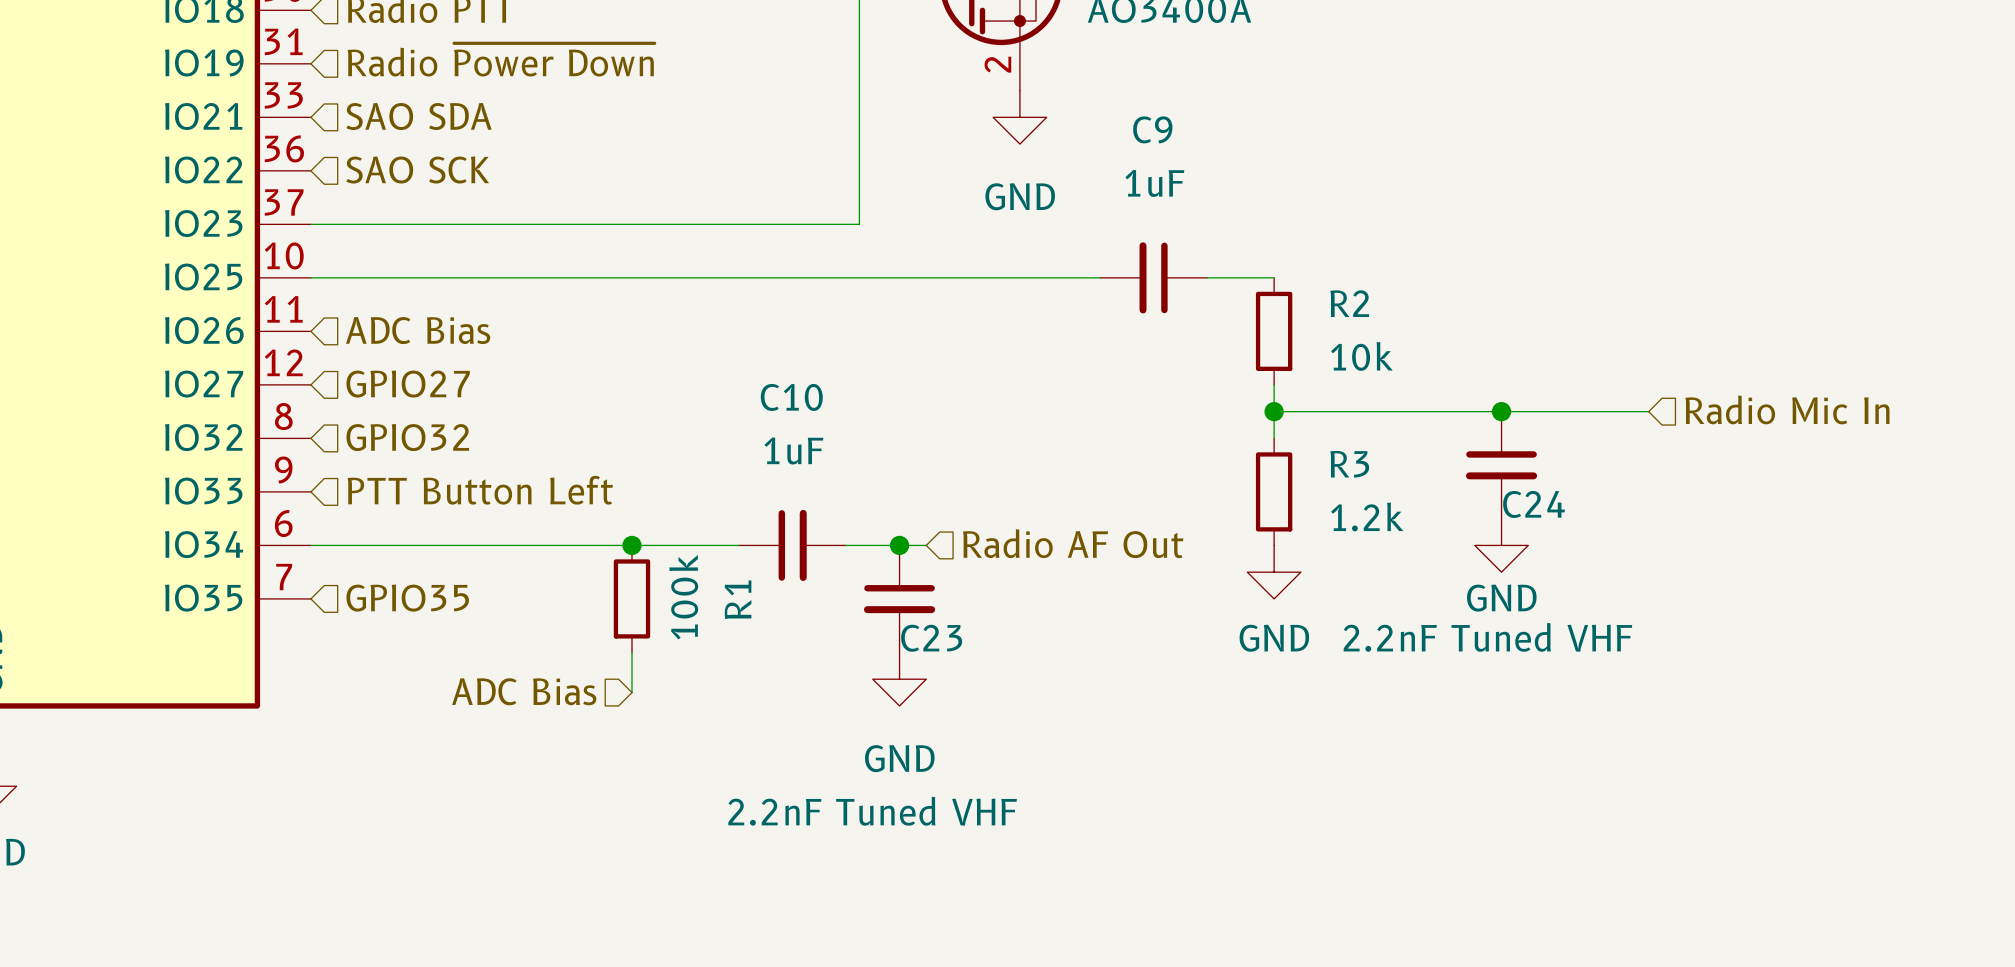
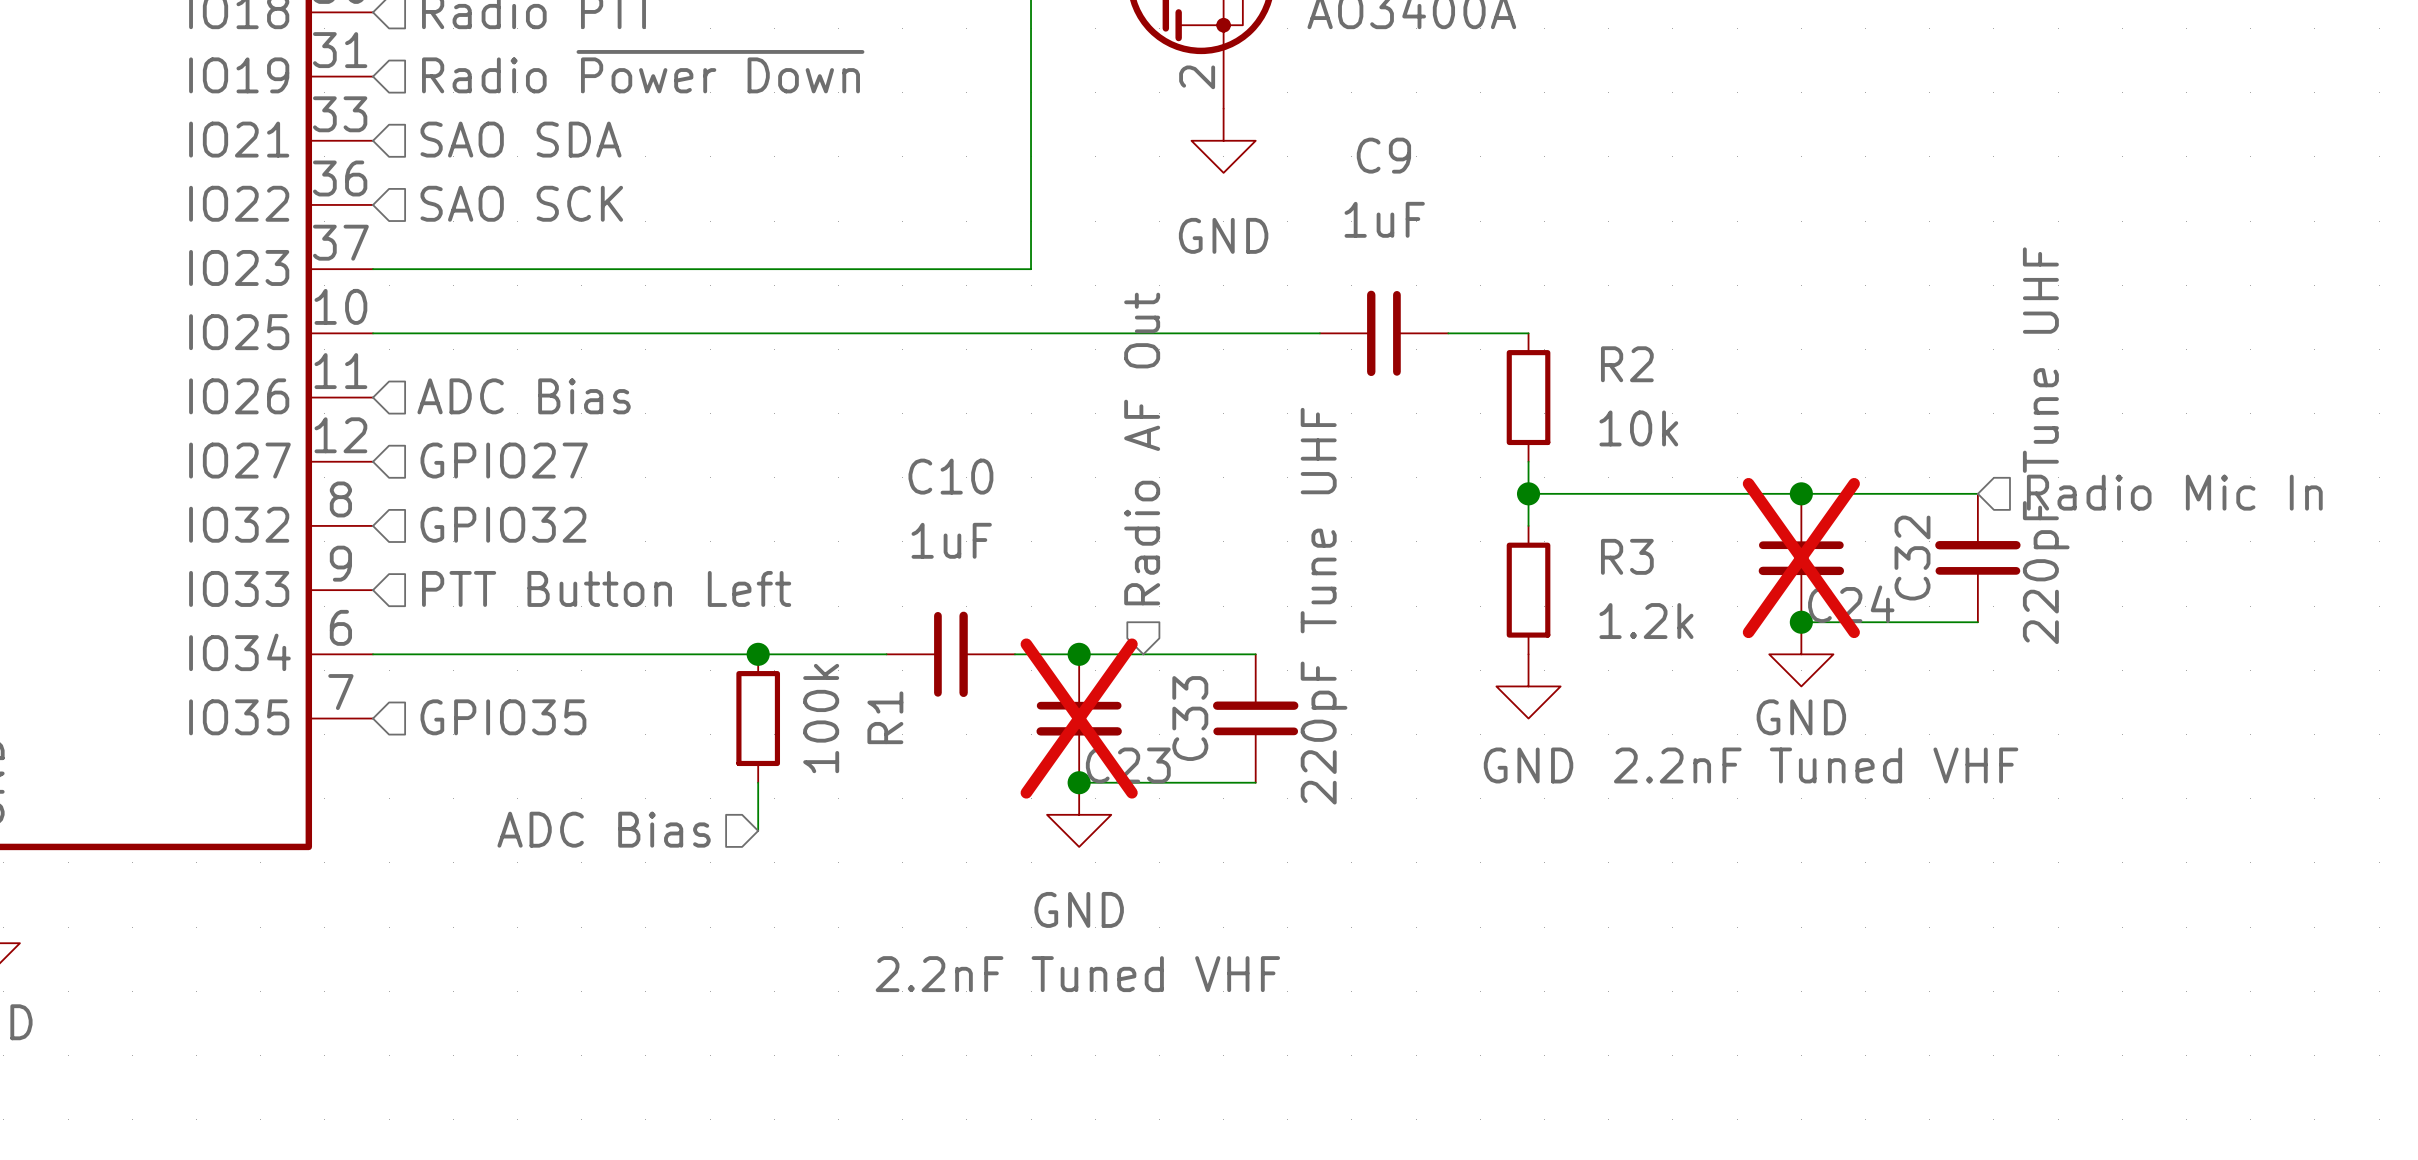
C24 do-not-place cross: none -> (1801, 558)
C32: none -> 220pF Tune UHF (1977, 558)
wire: none -> (1801, 622) (1977, 622)
junction: none -> (1801, 622)
hierarchical label rotation: 0° (1073, 543) -> 90° counterclockwise (1142, 449)
wire: none -> (1111, 654) (1255, 654)
C23 do-not-place cross: none -> (1079, 718)
C33: none -> 220pF Tune UHF (1255, 718)
wire: none -> (1079, 782) (1255, 782)
junction: none -> (1079, 782)

